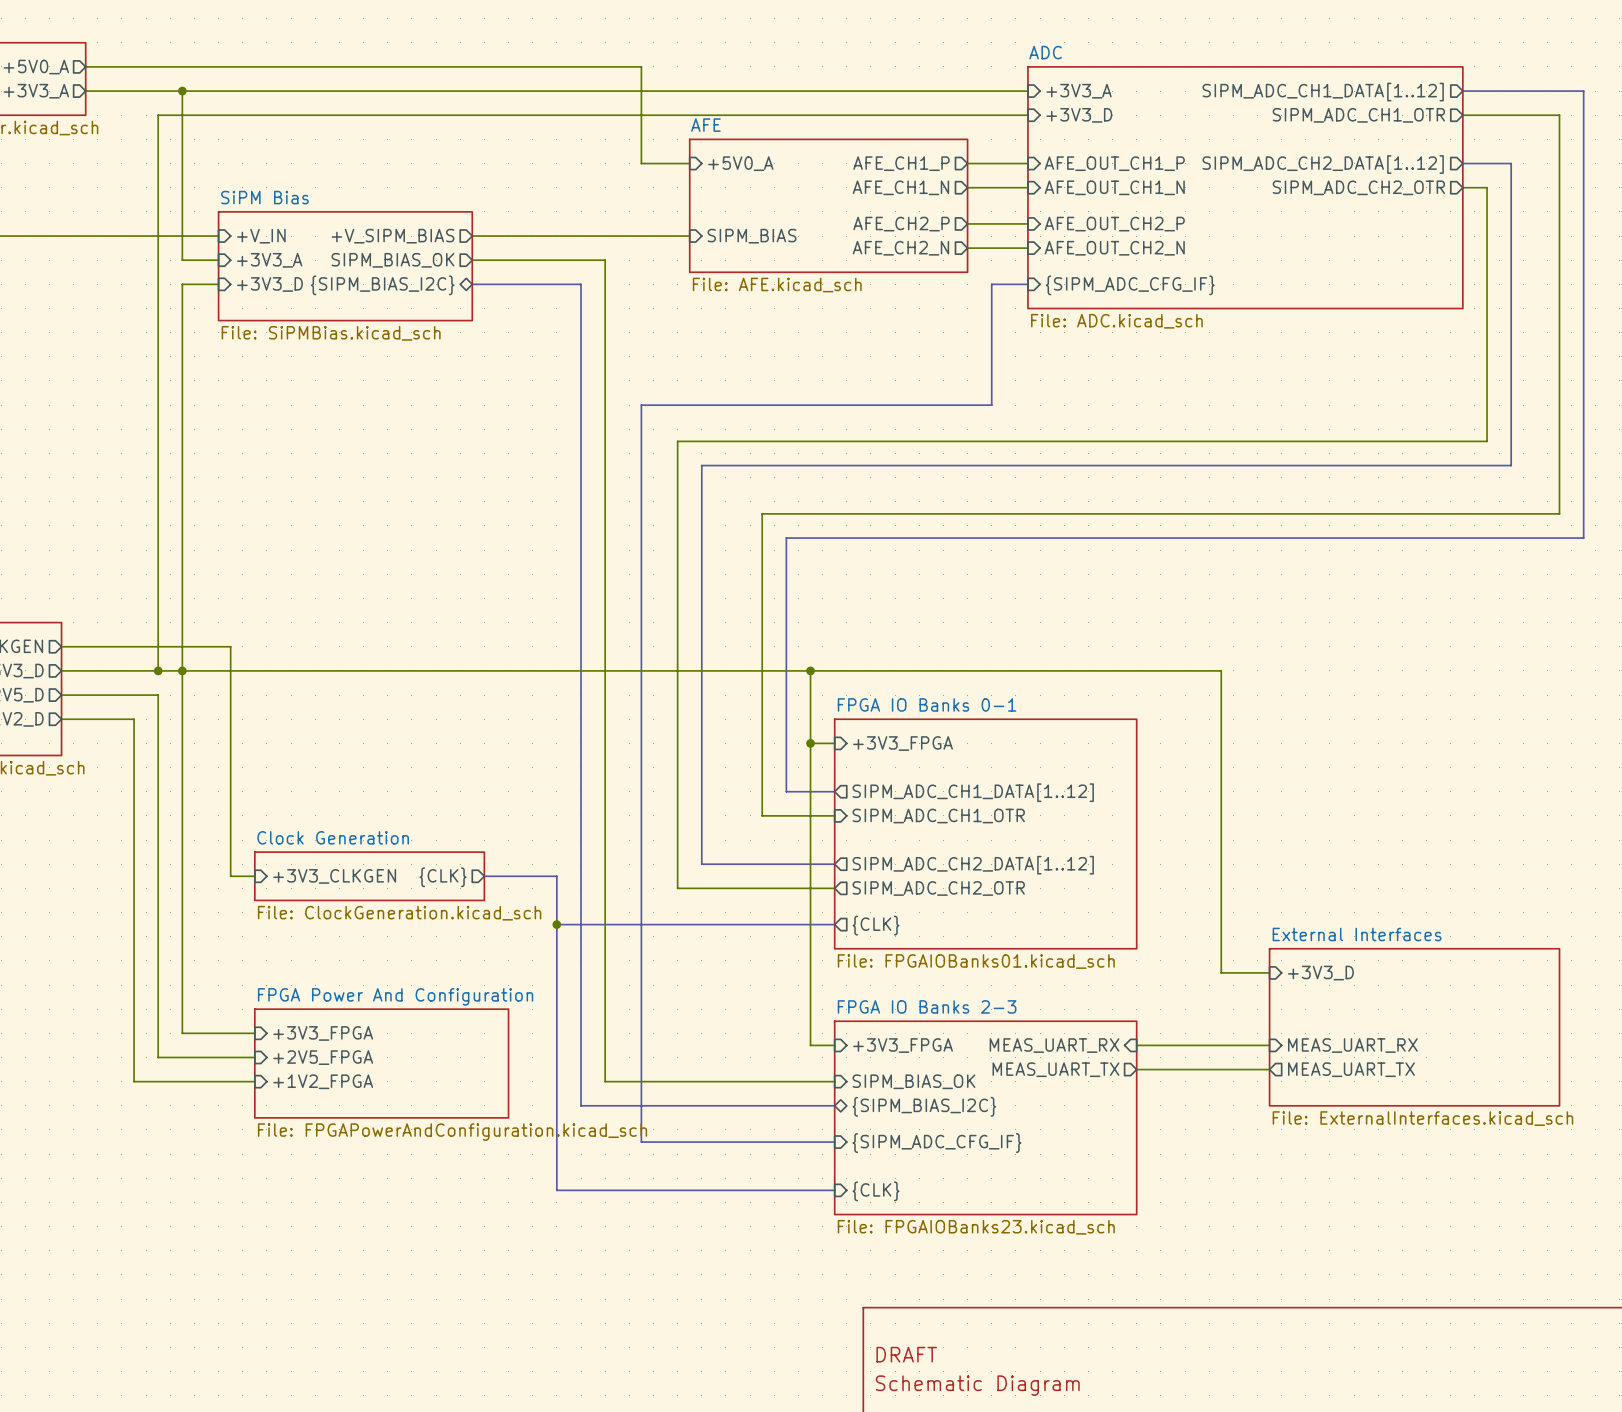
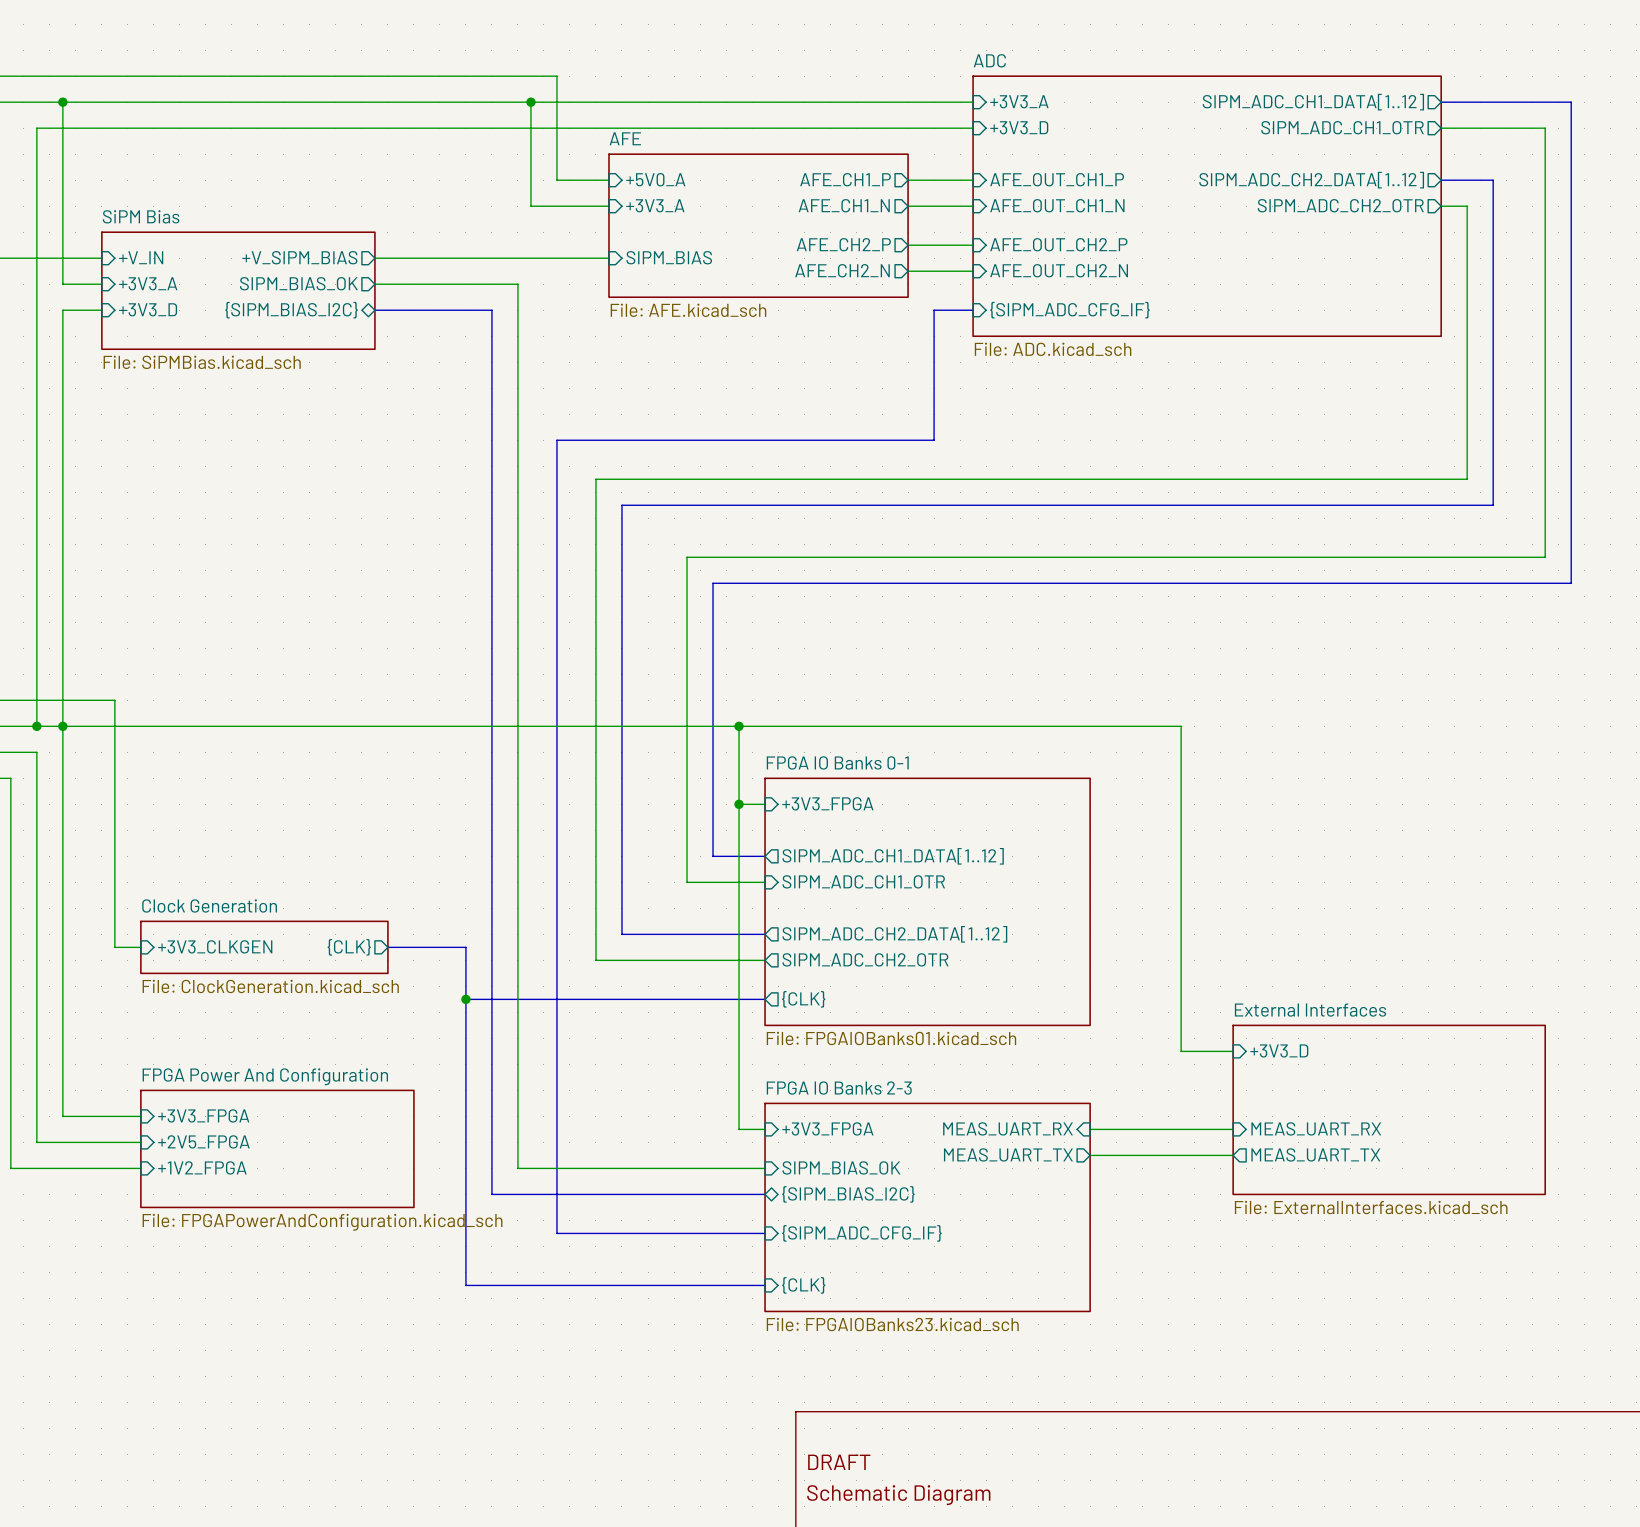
wire: none -> (530, 102) (530, 206) (608, 206)
junction: none -> (530, 102)
sheet pin: none -> +3V3_A (655, 205)

